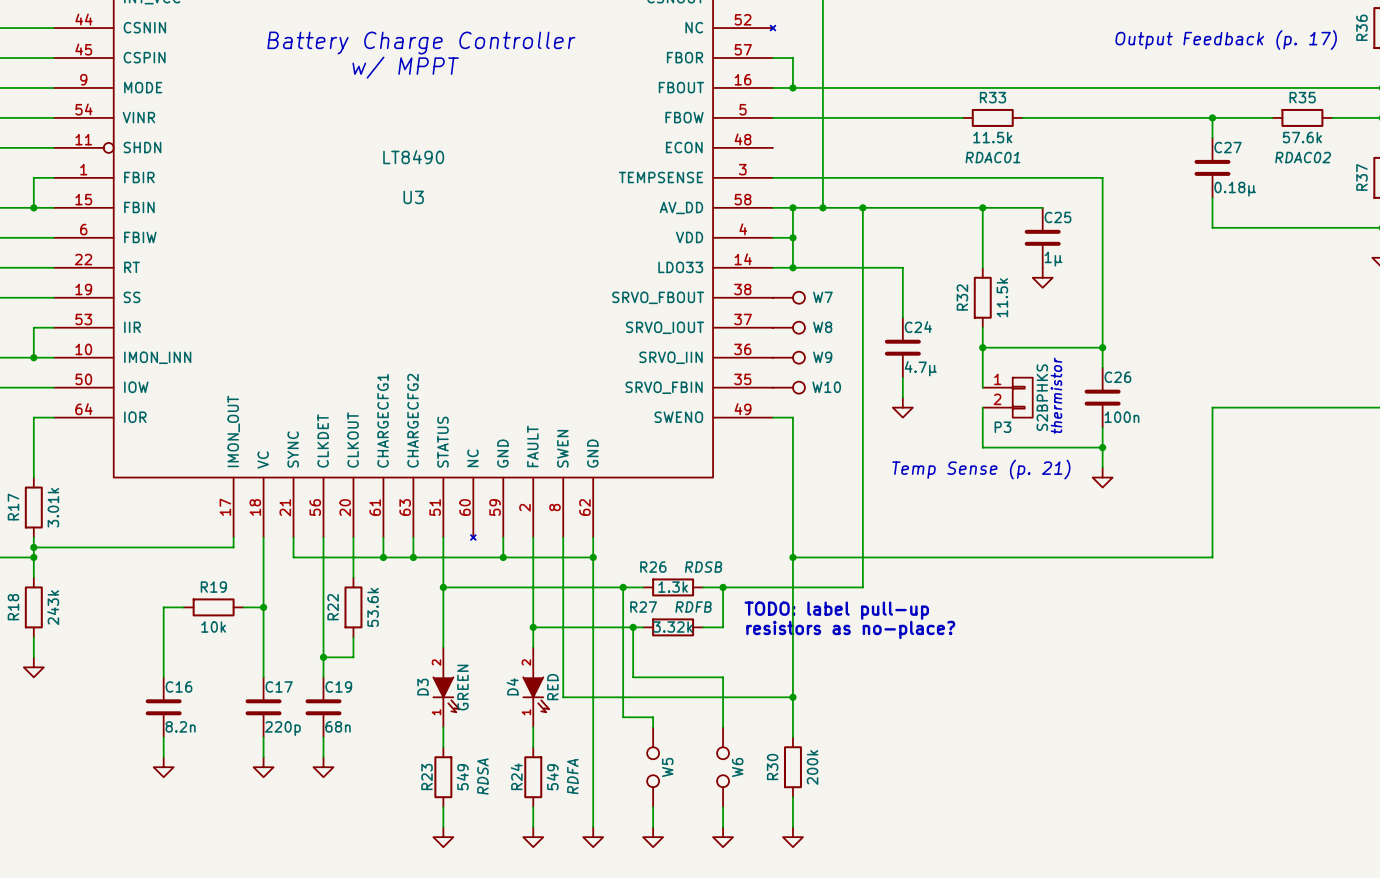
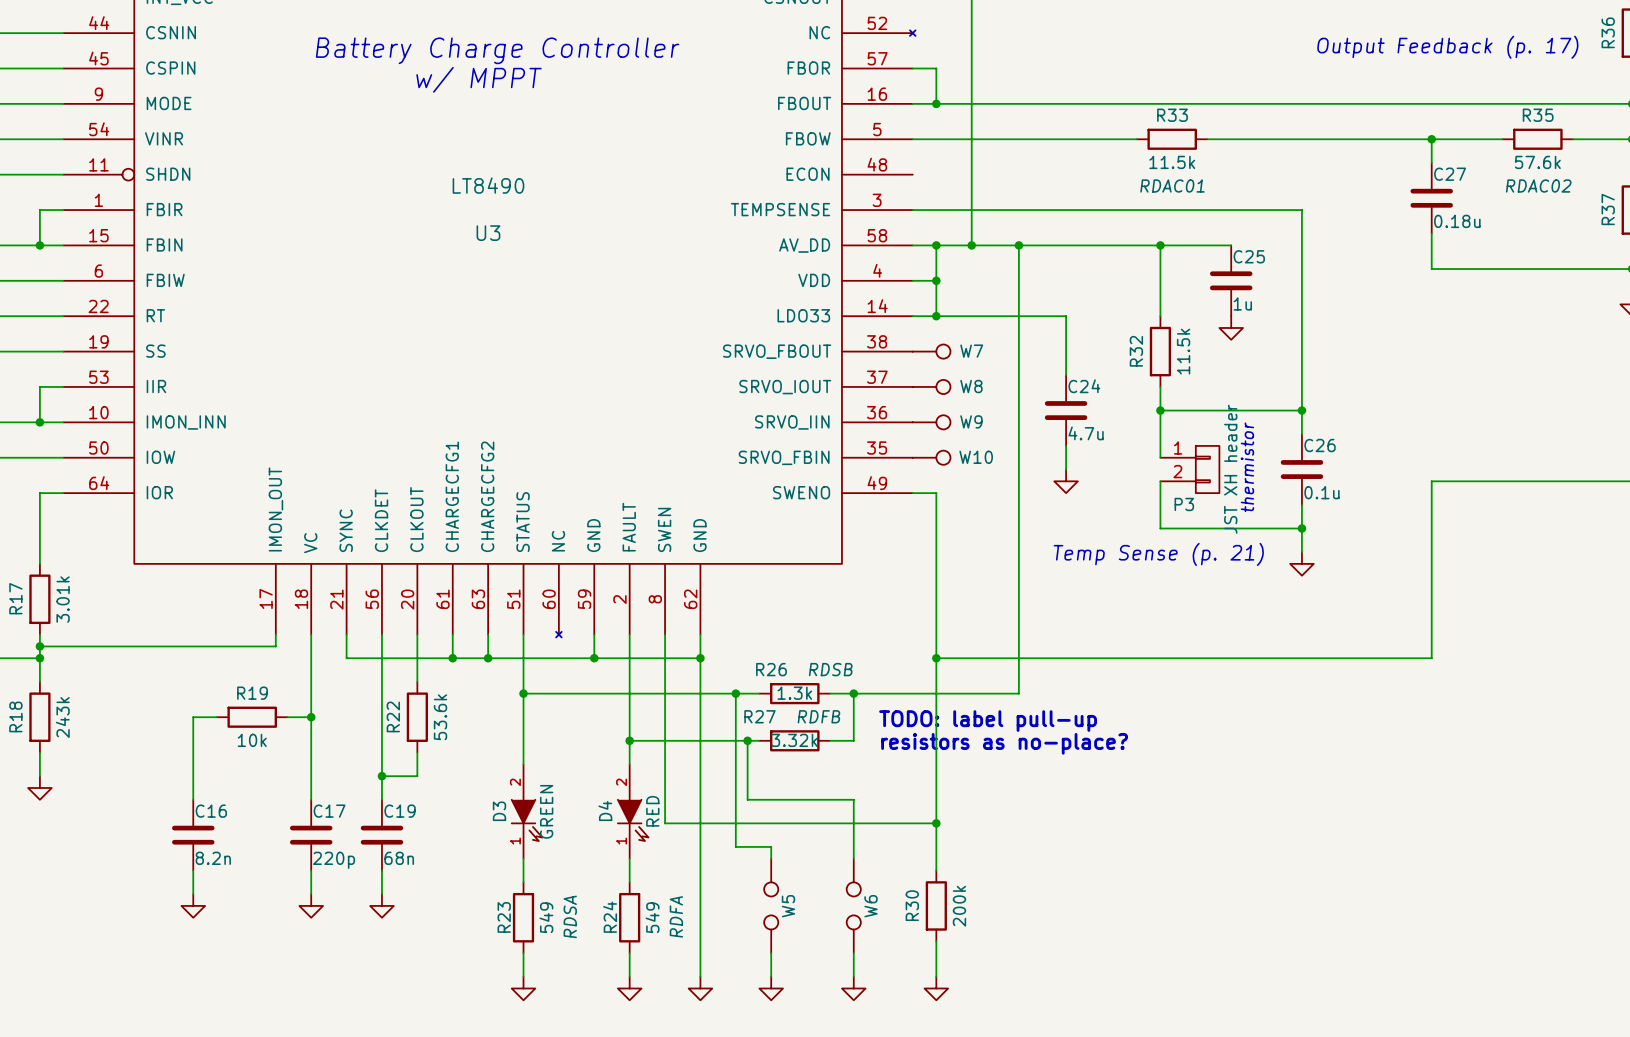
C27 value: 0.18µ (1235, 189) -> 0.18u (1457, 221)
C25 value: 1µ (1053, 259) -> 1u (1242, 303)
C24 value: 4.7µ (920, 368) -> 4.7u (1086, 433)
P3 value: S2BPHKS (1042, 397) -> JST XH header (1230, 469)
C26 value: 100n (1121, 417) -> 0.1u (1321, 492)

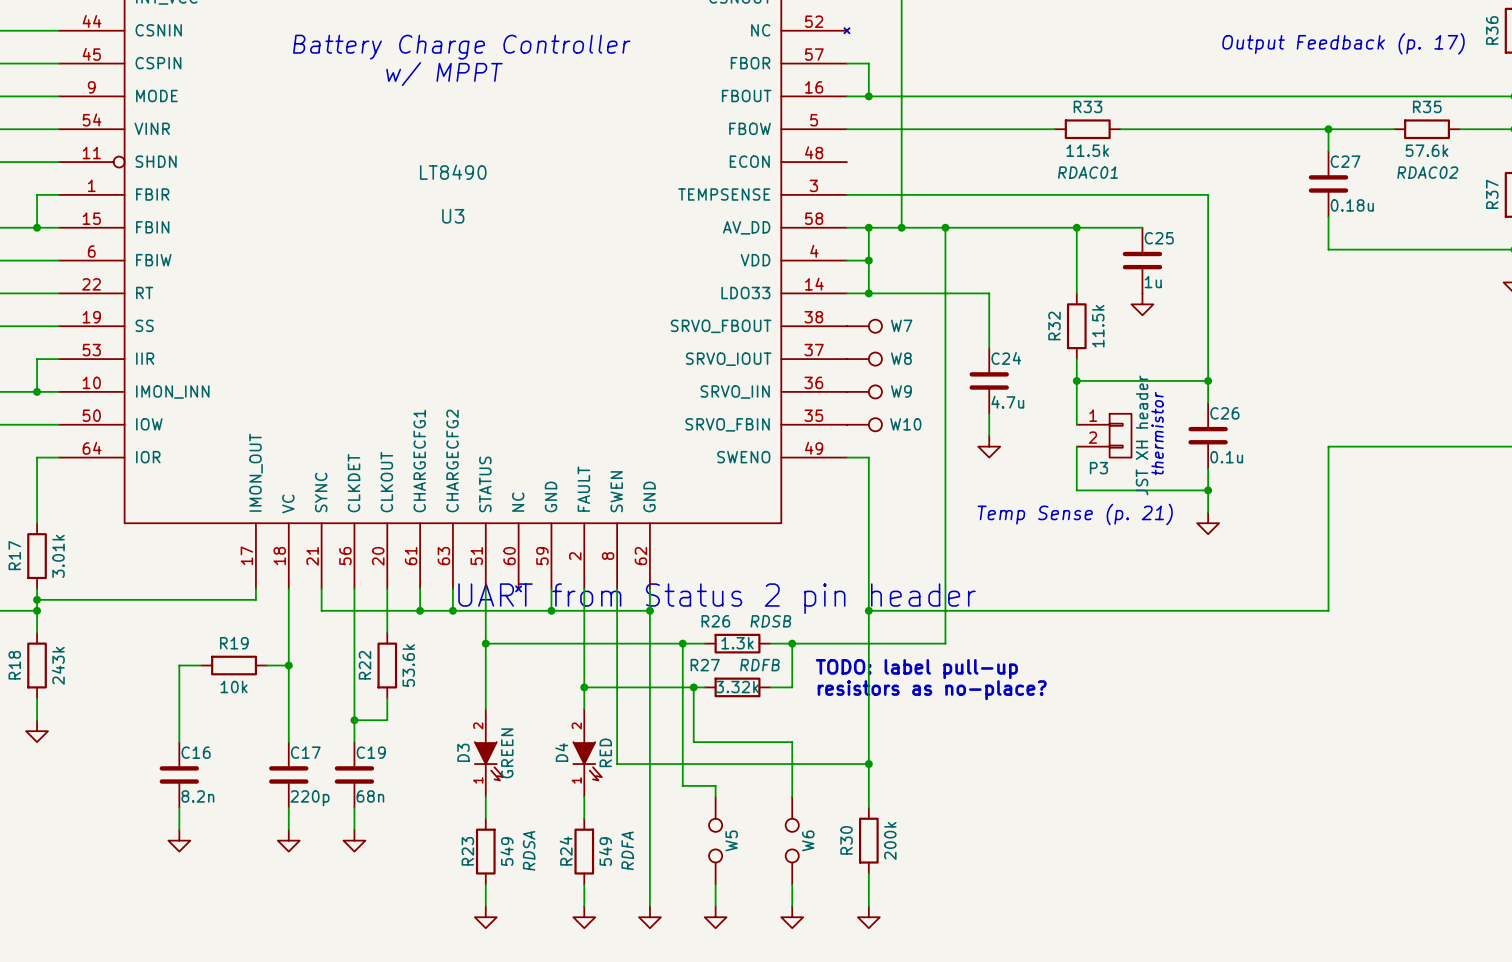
text: none -> UART from Status 2 pin header (717, 598)

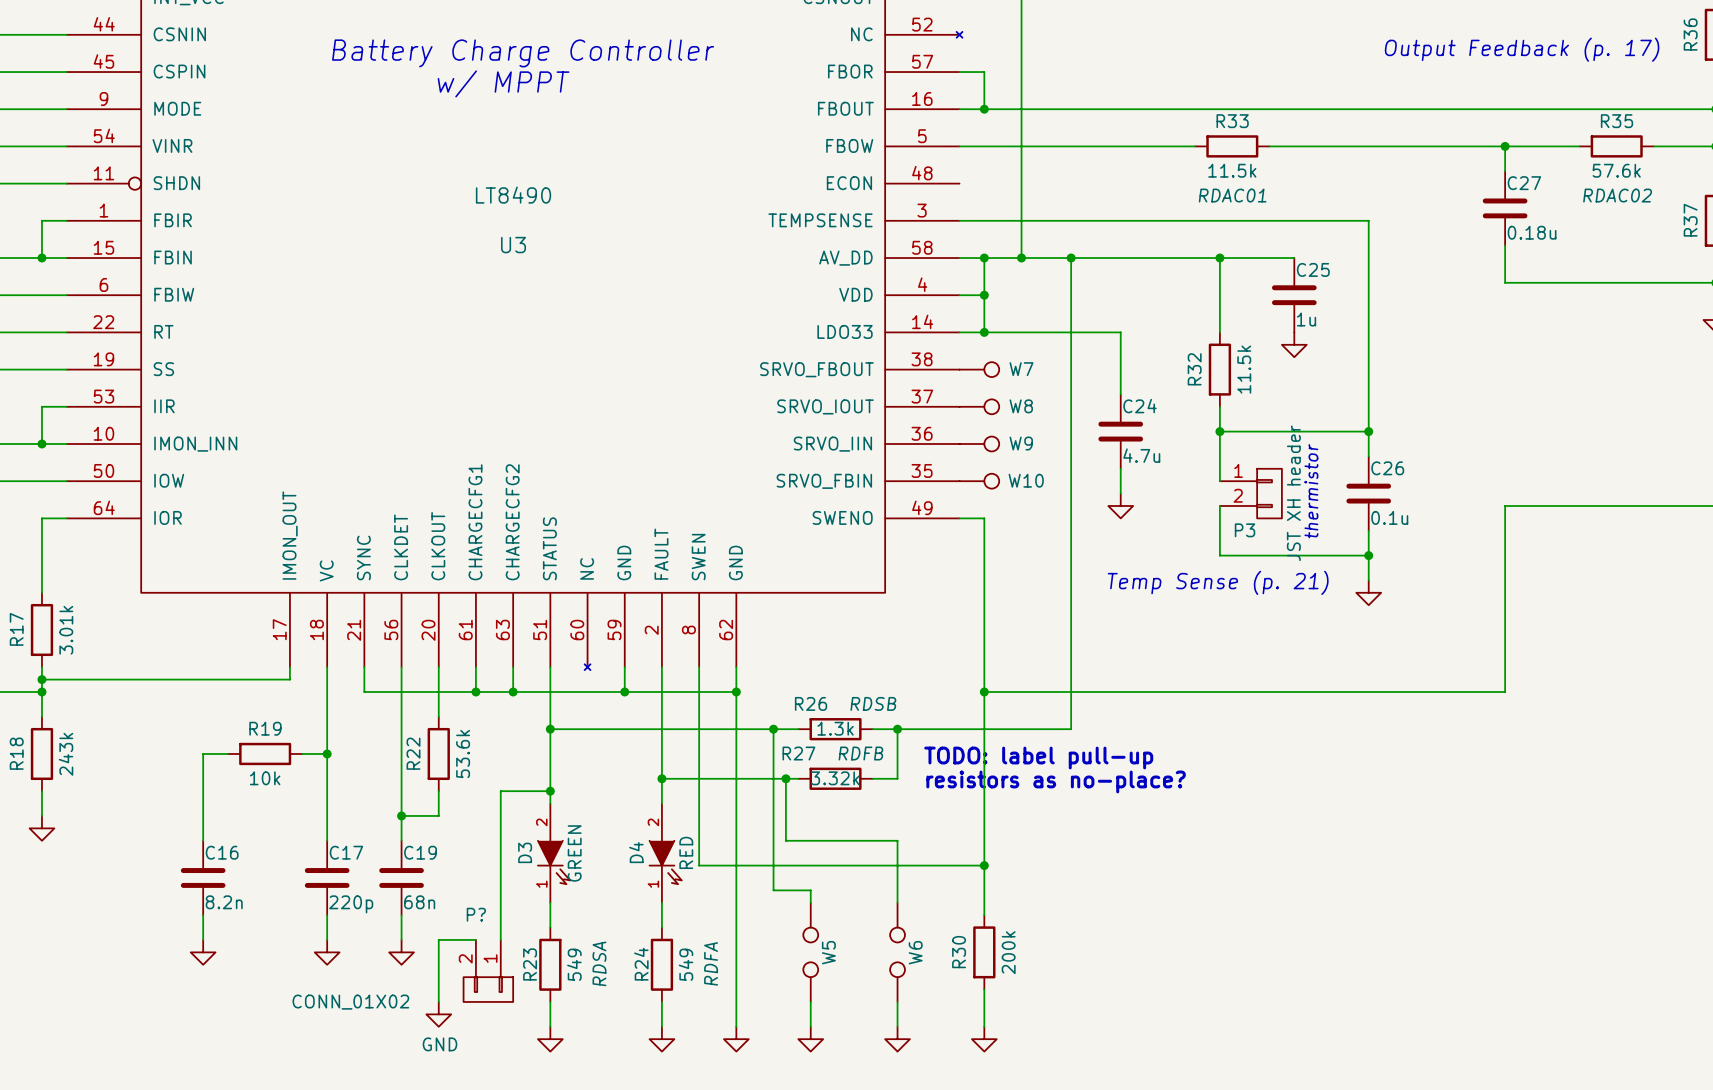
text: UART from Status 2 pin header (717, 598) -> none
wire: none -> (550, 791) (500, 791) (500, 939)
junction: none -> (550, 791)
wire: none -> (475, 939) (438, 939) (438, 1001)
P?: none -> CONN_01X02 (488, 970)
power symbol: none -> GND (438, 1014)

